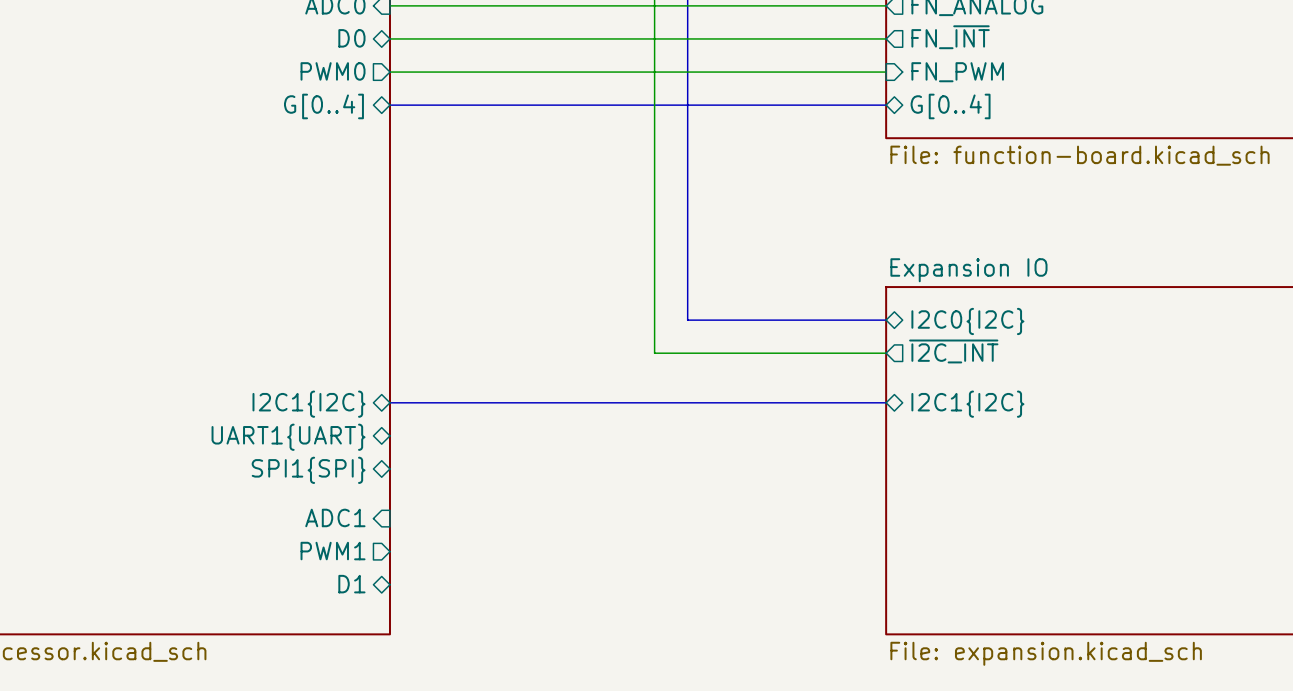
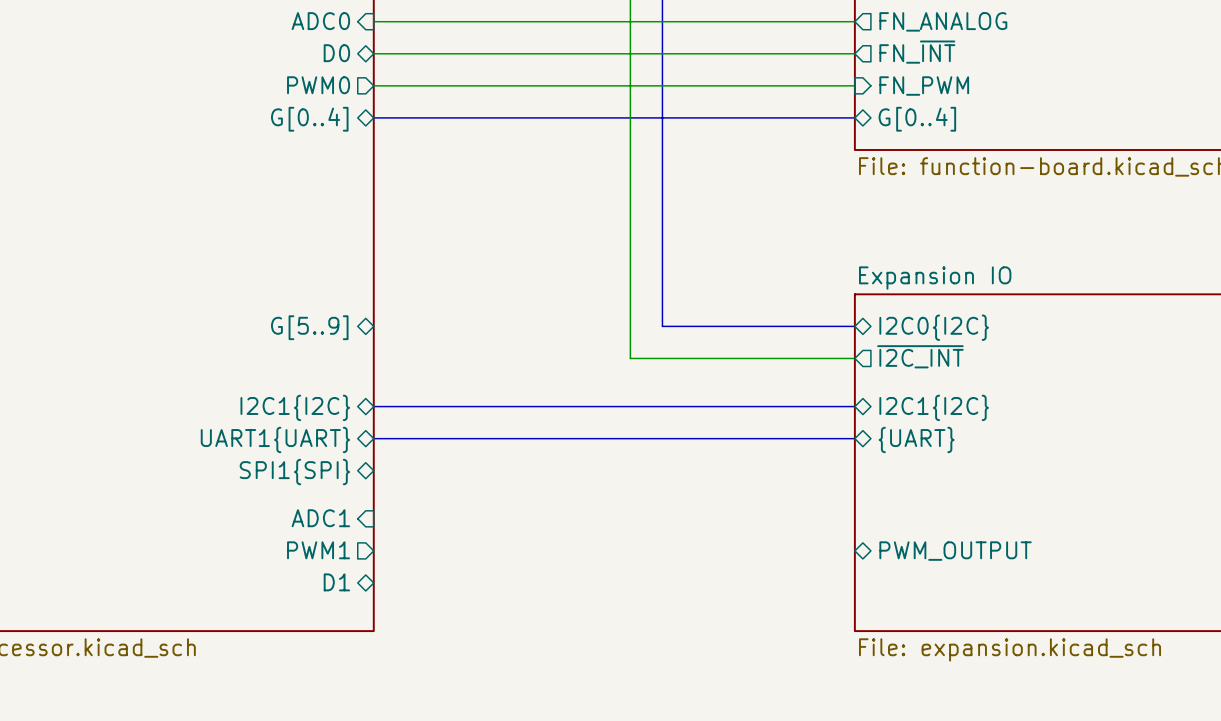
sheet pin: none -> G[5..9] (309, 327)
bus: none -> (373, 438) (854, 438)
sheet pin: none -> {UART} (916, 439)
sheet pin: none -> PWM_OUTPUT (955, 551)

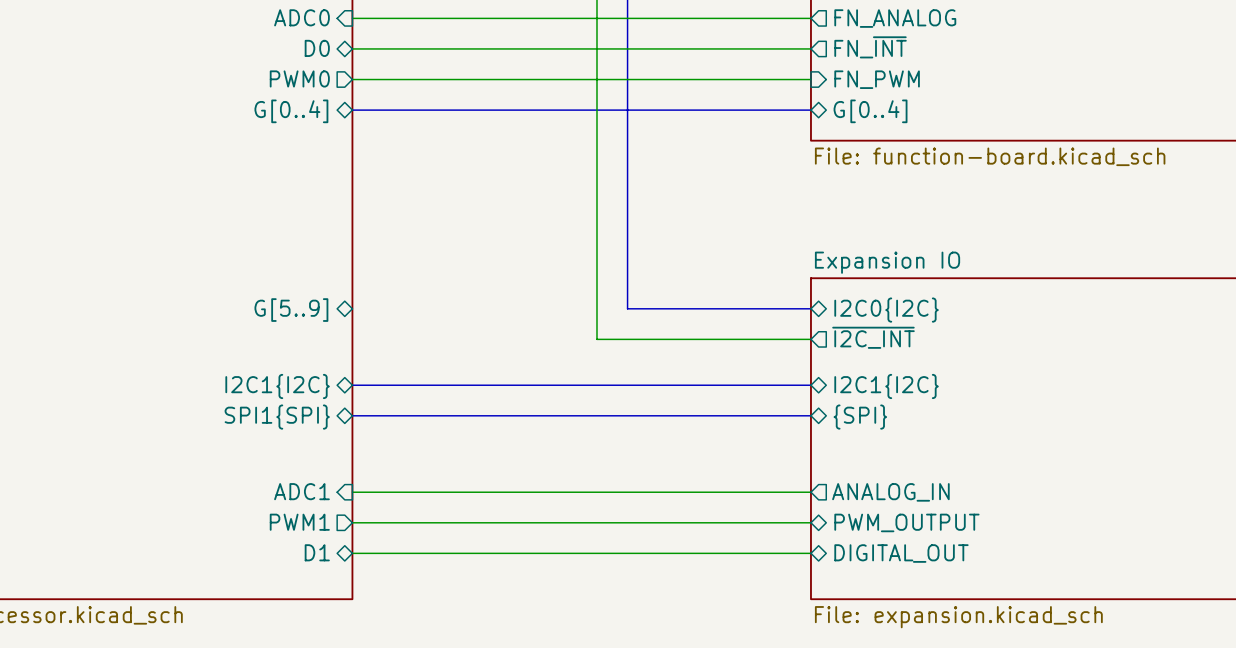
sheet pin: UART1{UART} (275, 439) -> SPI1{SPI} (277, 417)
sheet pin: {UART} (916, 439) -> {SPI} (860, 417)
sheet pin: SPI1{SPI} (294, 472) -> none
wire: none -> (352, 492) (810, 492)
sheet pin: none -> ANALOG_IN (890, 492)
wire: none -> (352, 522) (810, 522)
wire: none -> (352, 553) (810, 553)
sheet pin: none -> DIGITAL_OUT (901, 553)

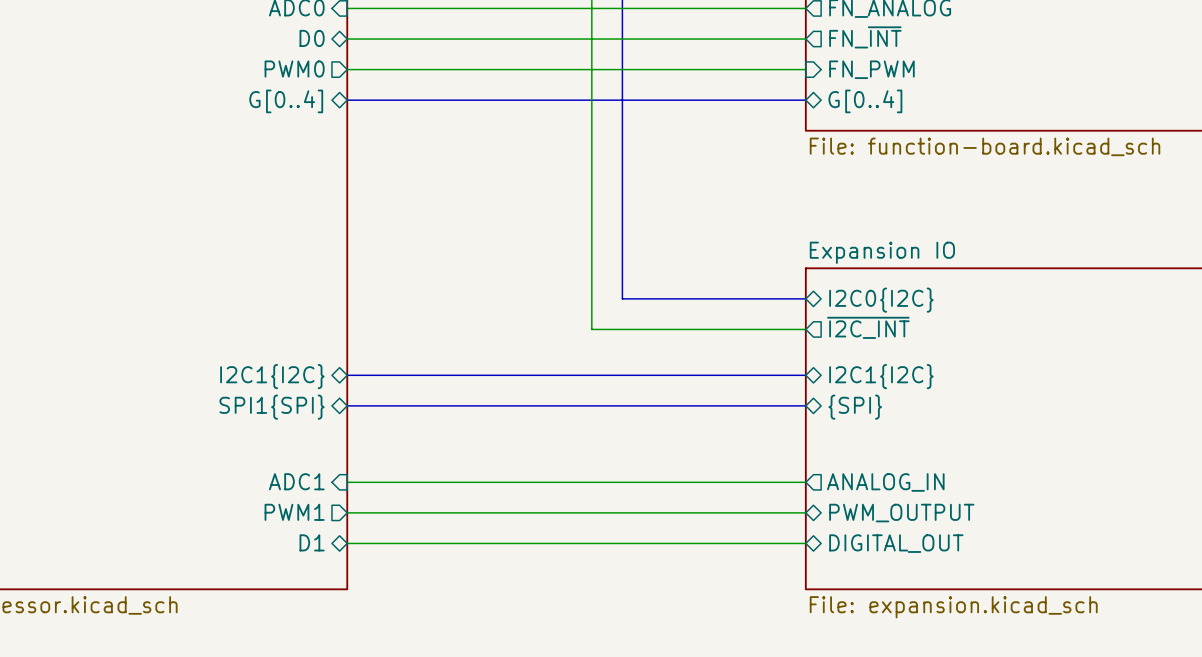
sheet pin: G[5..9] (291, 310) -> none

